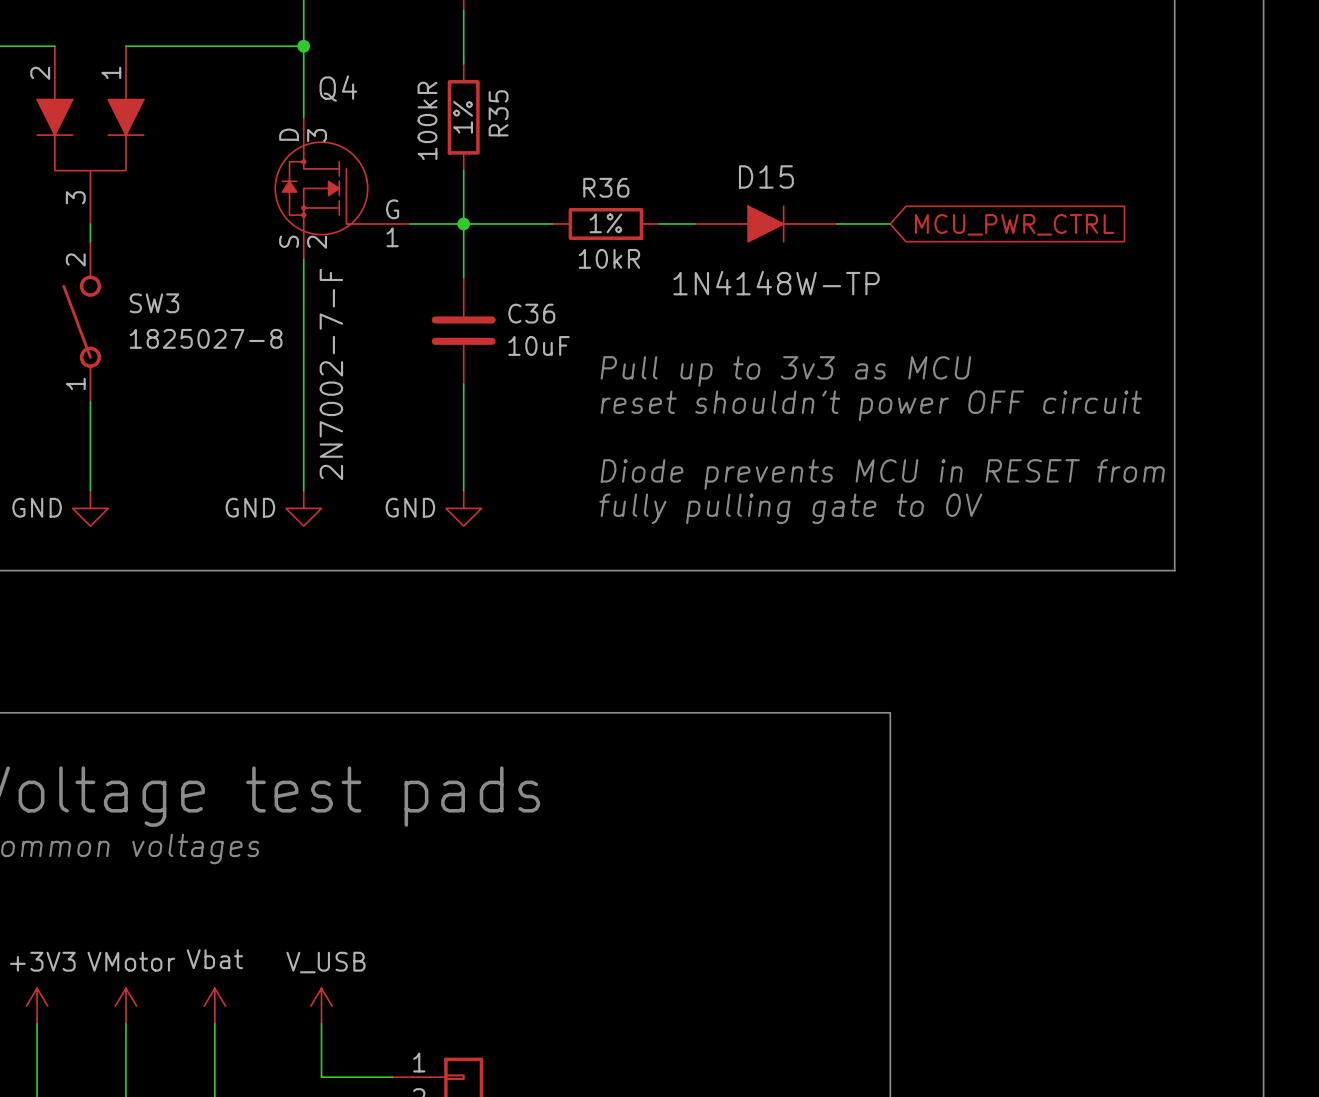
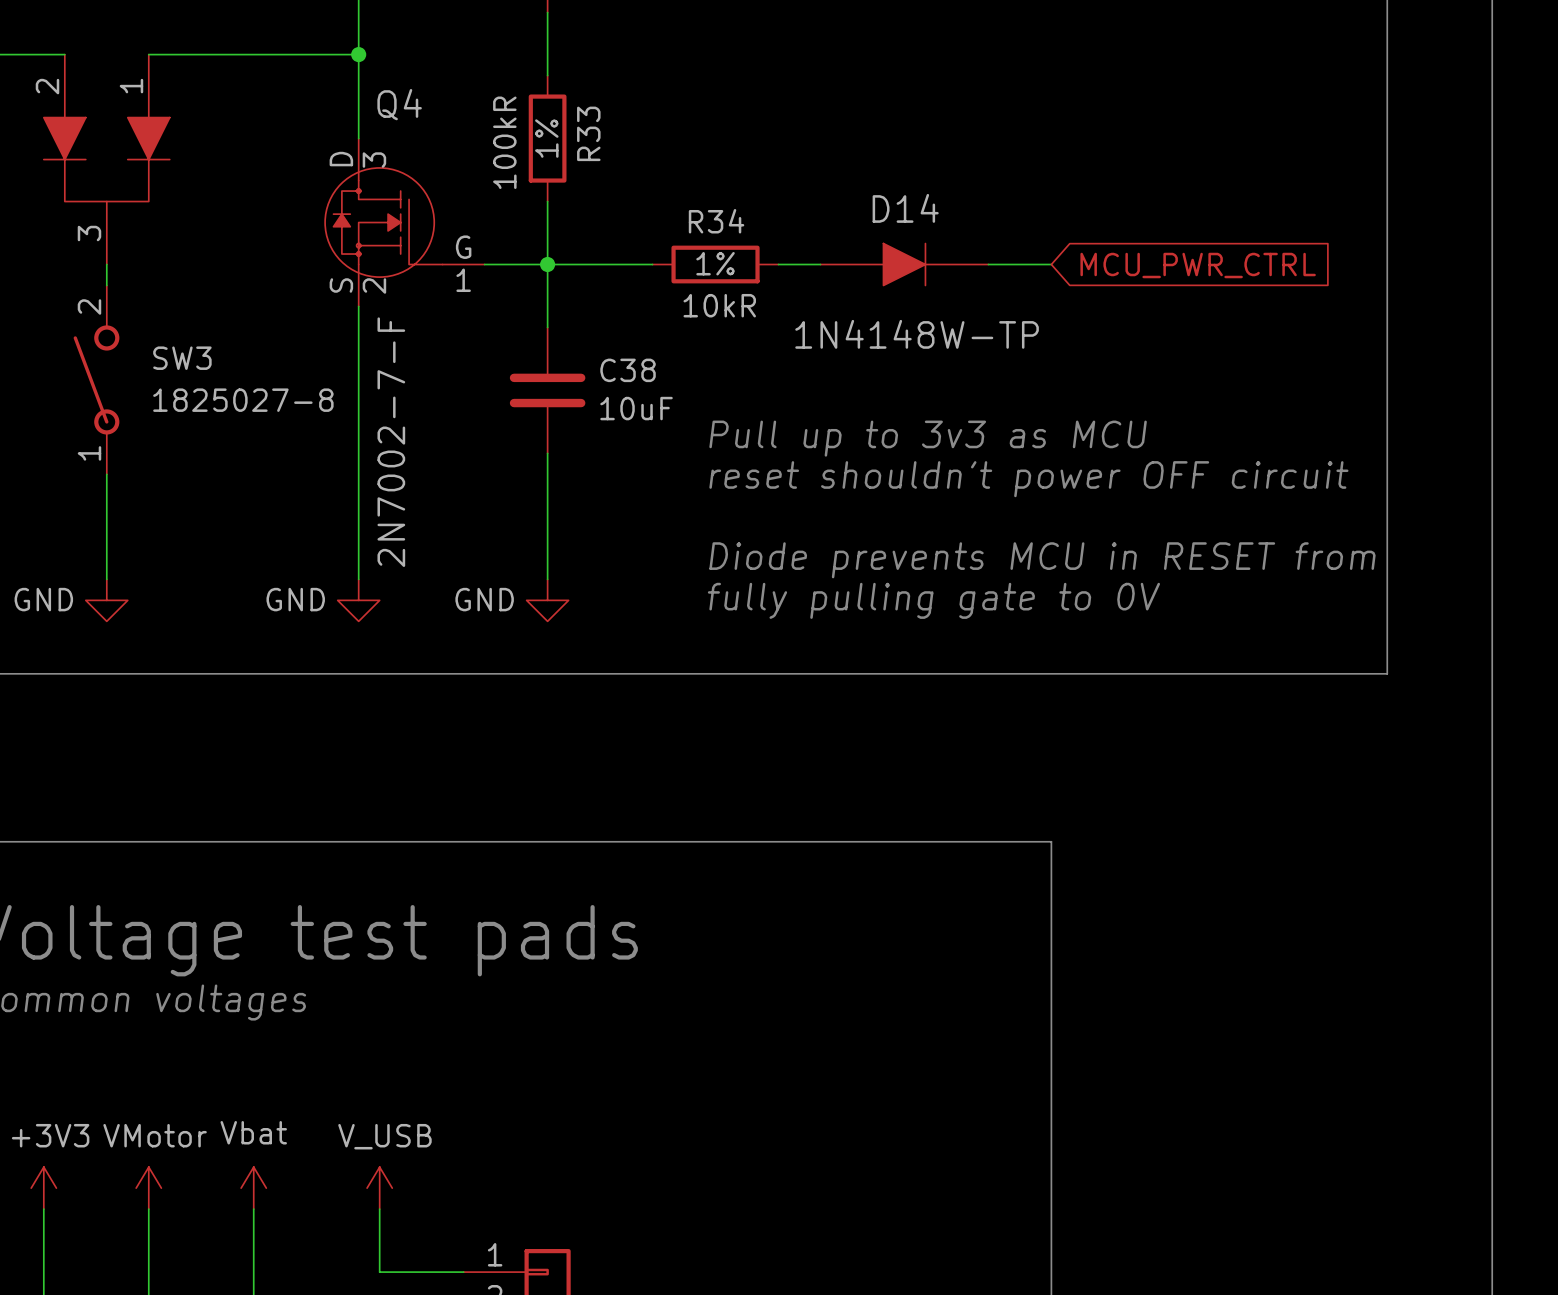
R35 name: R35 (498, 113) -> R33 (588, 133)
D15 name: D15 (766, 176) -> D14 (905, 208)
R36 name: R36 (606, 187) -> R34 (716, 221)
C36 name: C36 (531, 313) -> C38 (628, 370)

